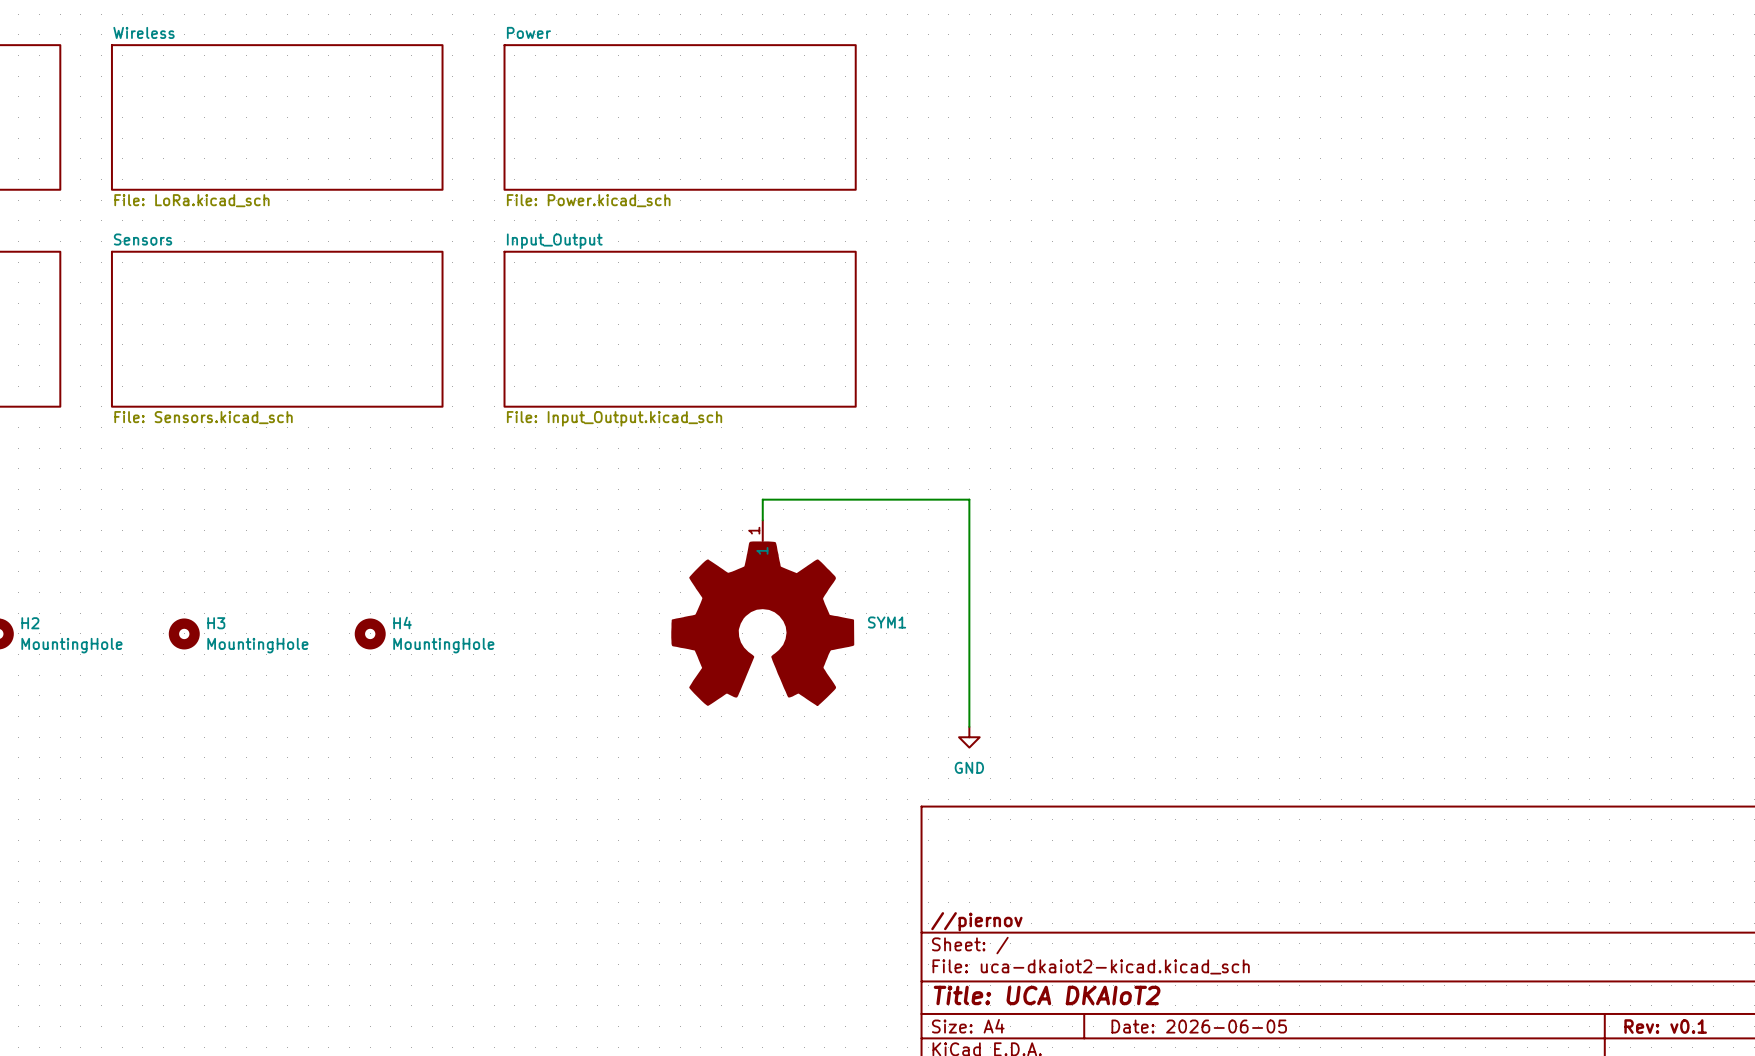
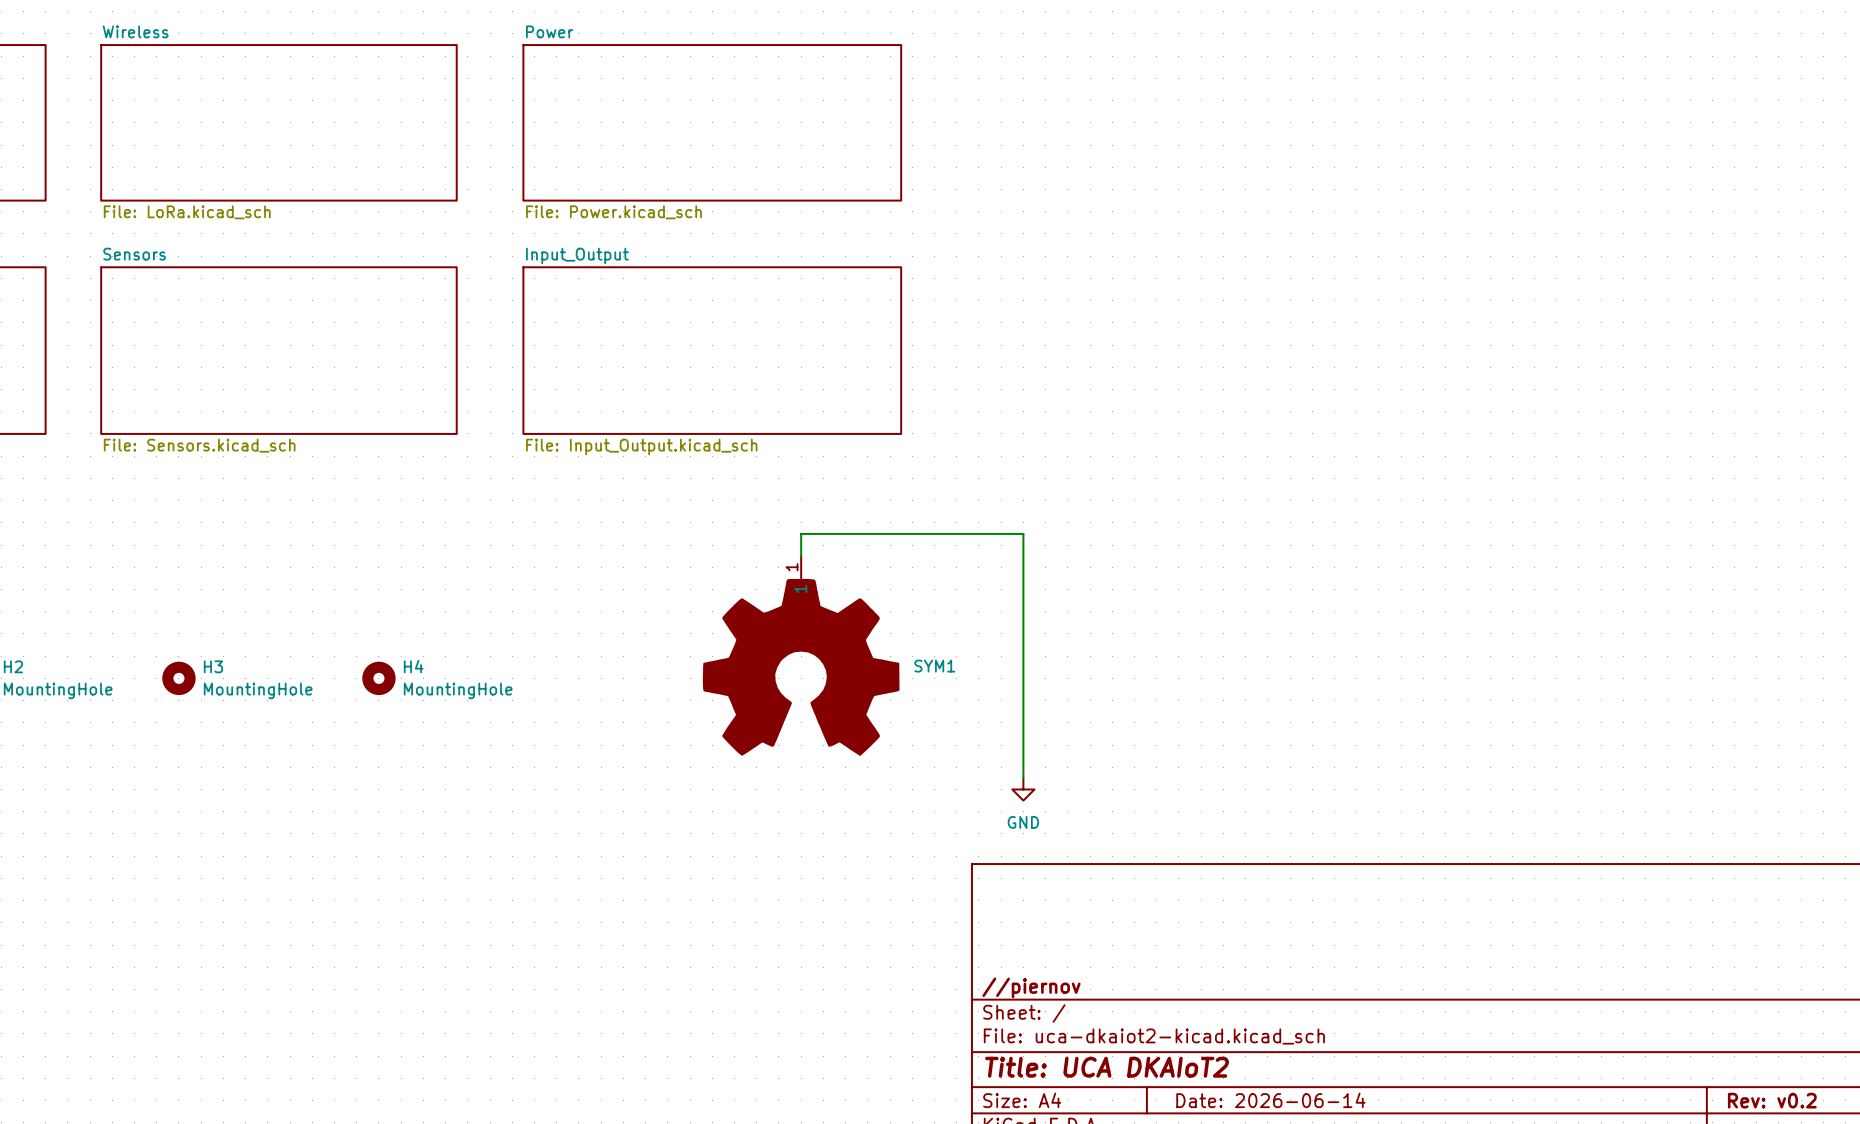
title block: Date: 2026-06-05 (1199, 1026) -> Date: 2026-06-14 (1270, 1100)
title block: Rev: v0.1 (1665, 1026) -> Rev: v0.2 (1772, 1100)

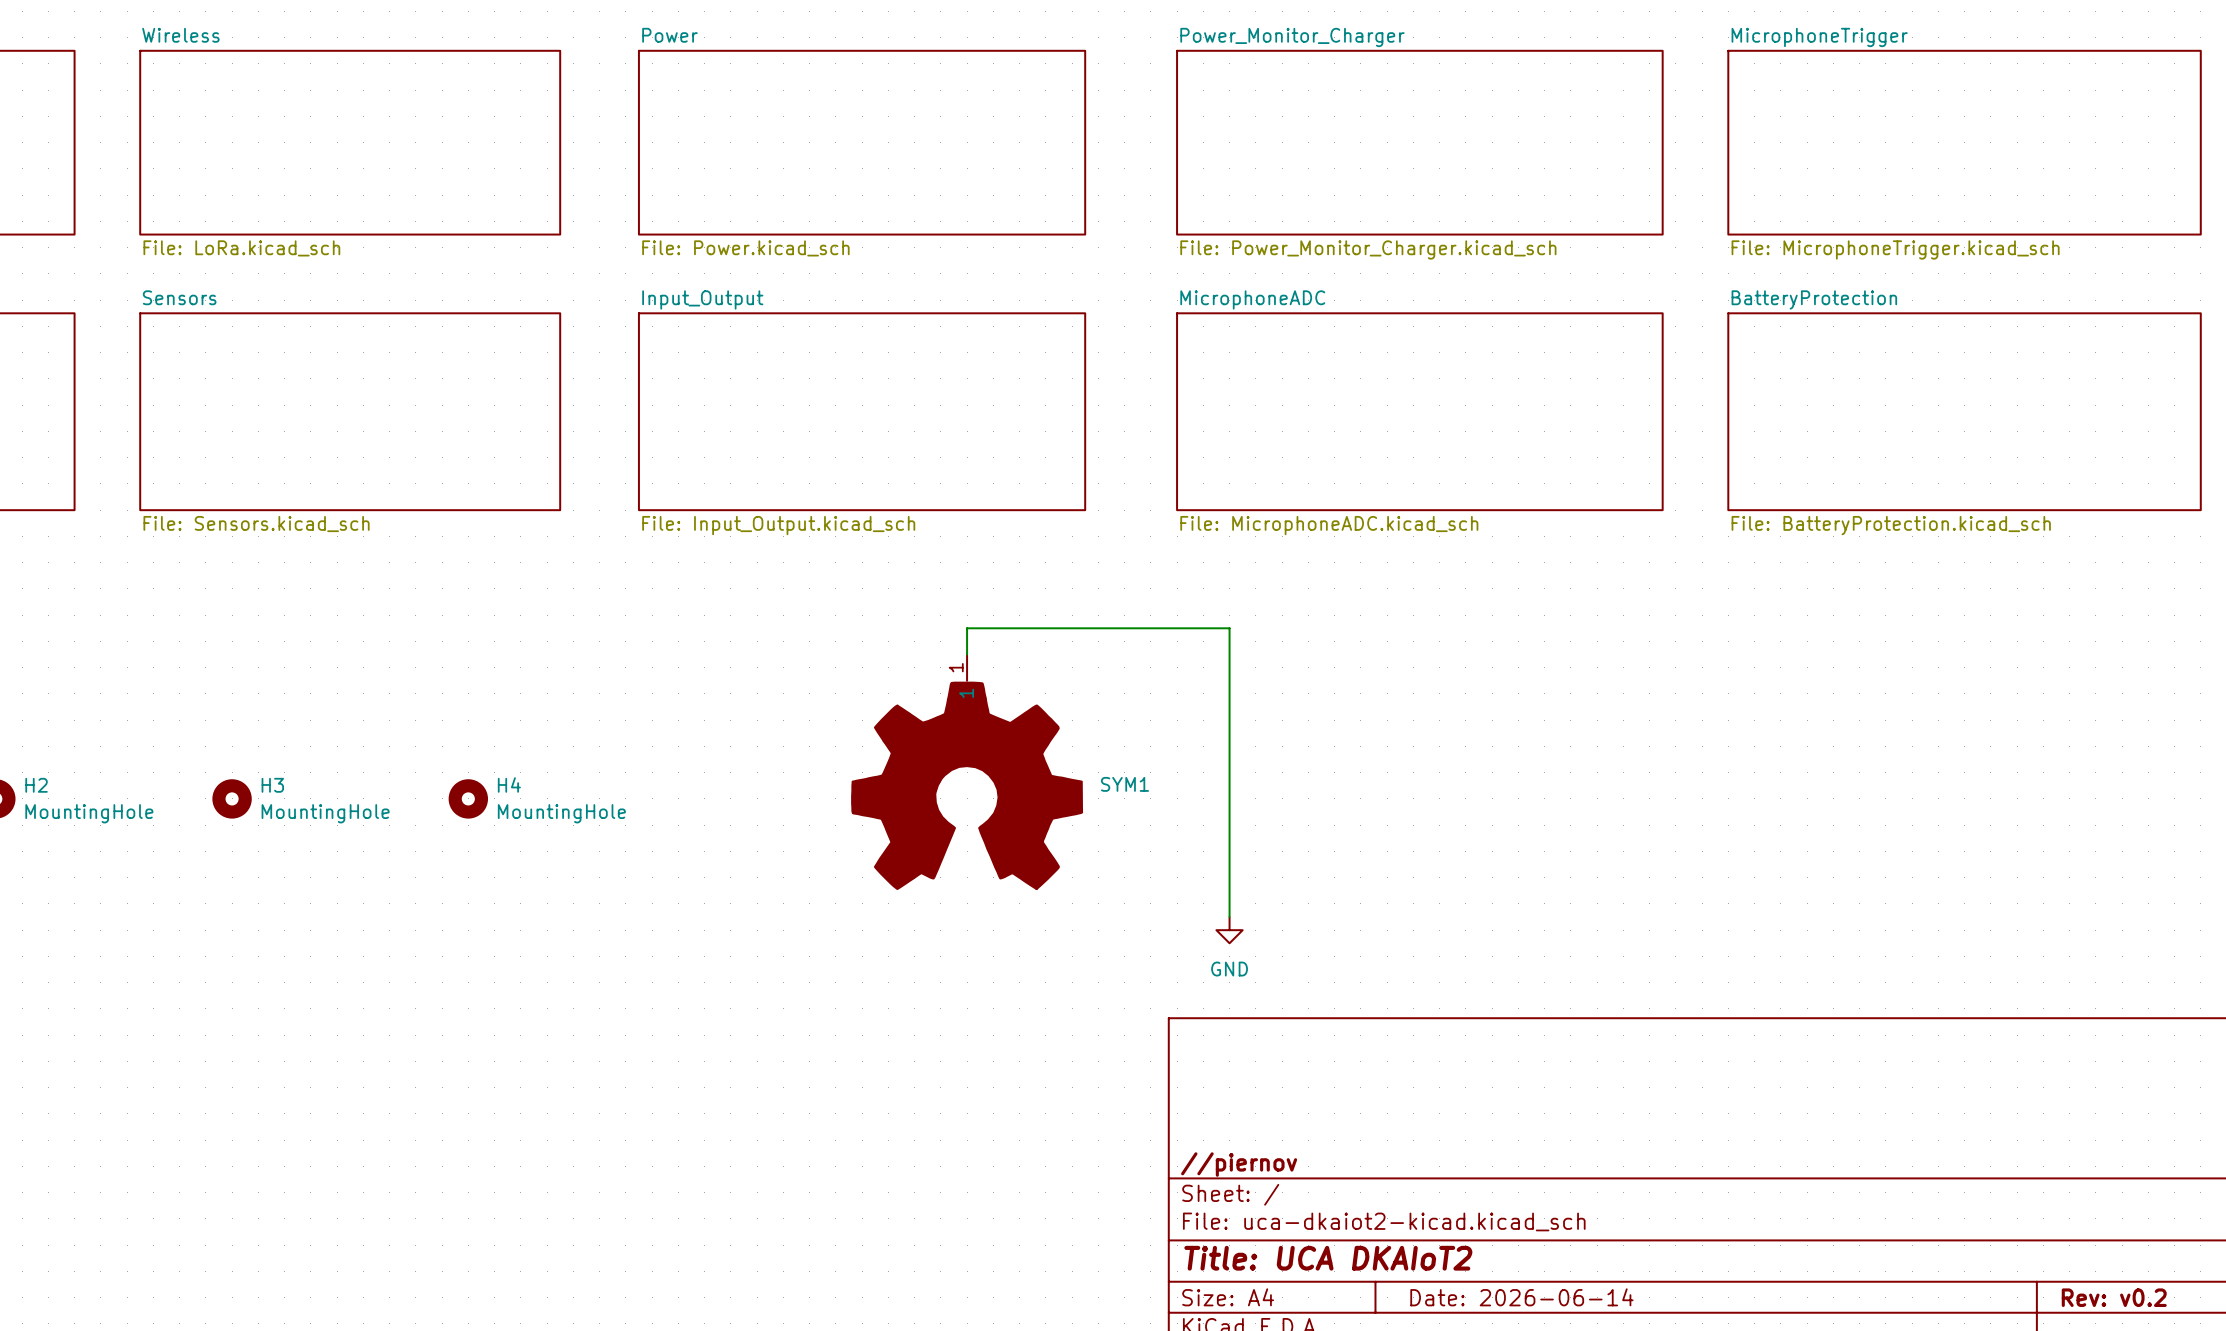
sheet Power_Monitor_Charger: none -> File: Power_Monitor_Charger.kicad_sch (1419, 142)
sheet MicrophoneTrigger: none -> File: MicrophoneTrigger.kicad_sch (1964, 142)
sheet MicrophoneADC: none -> File: MicrophoneADC.kicad_sch (1419, 411)
sheet BatteryProtection: none -> File: BatteryProtection.kicad_sch (1964, 411)

